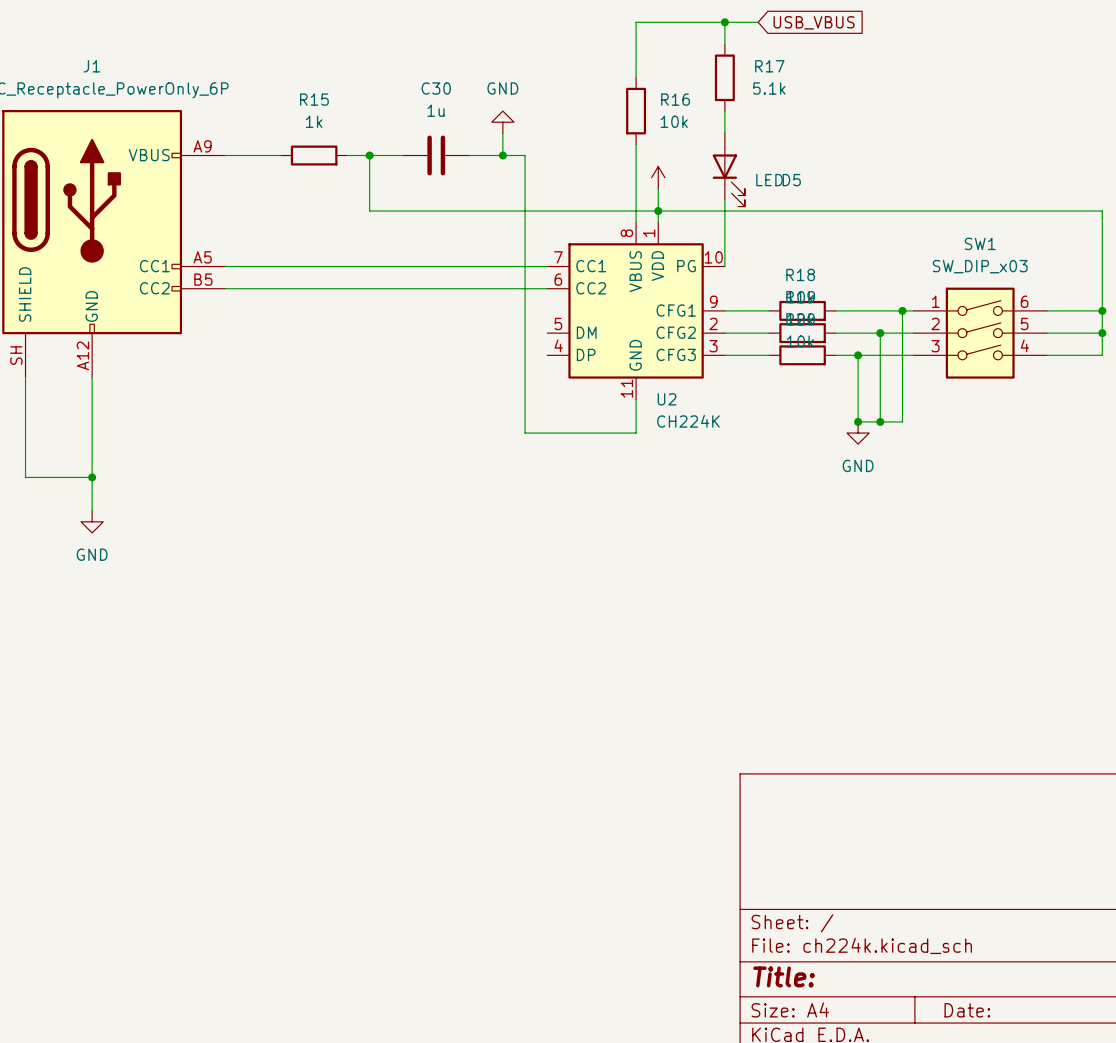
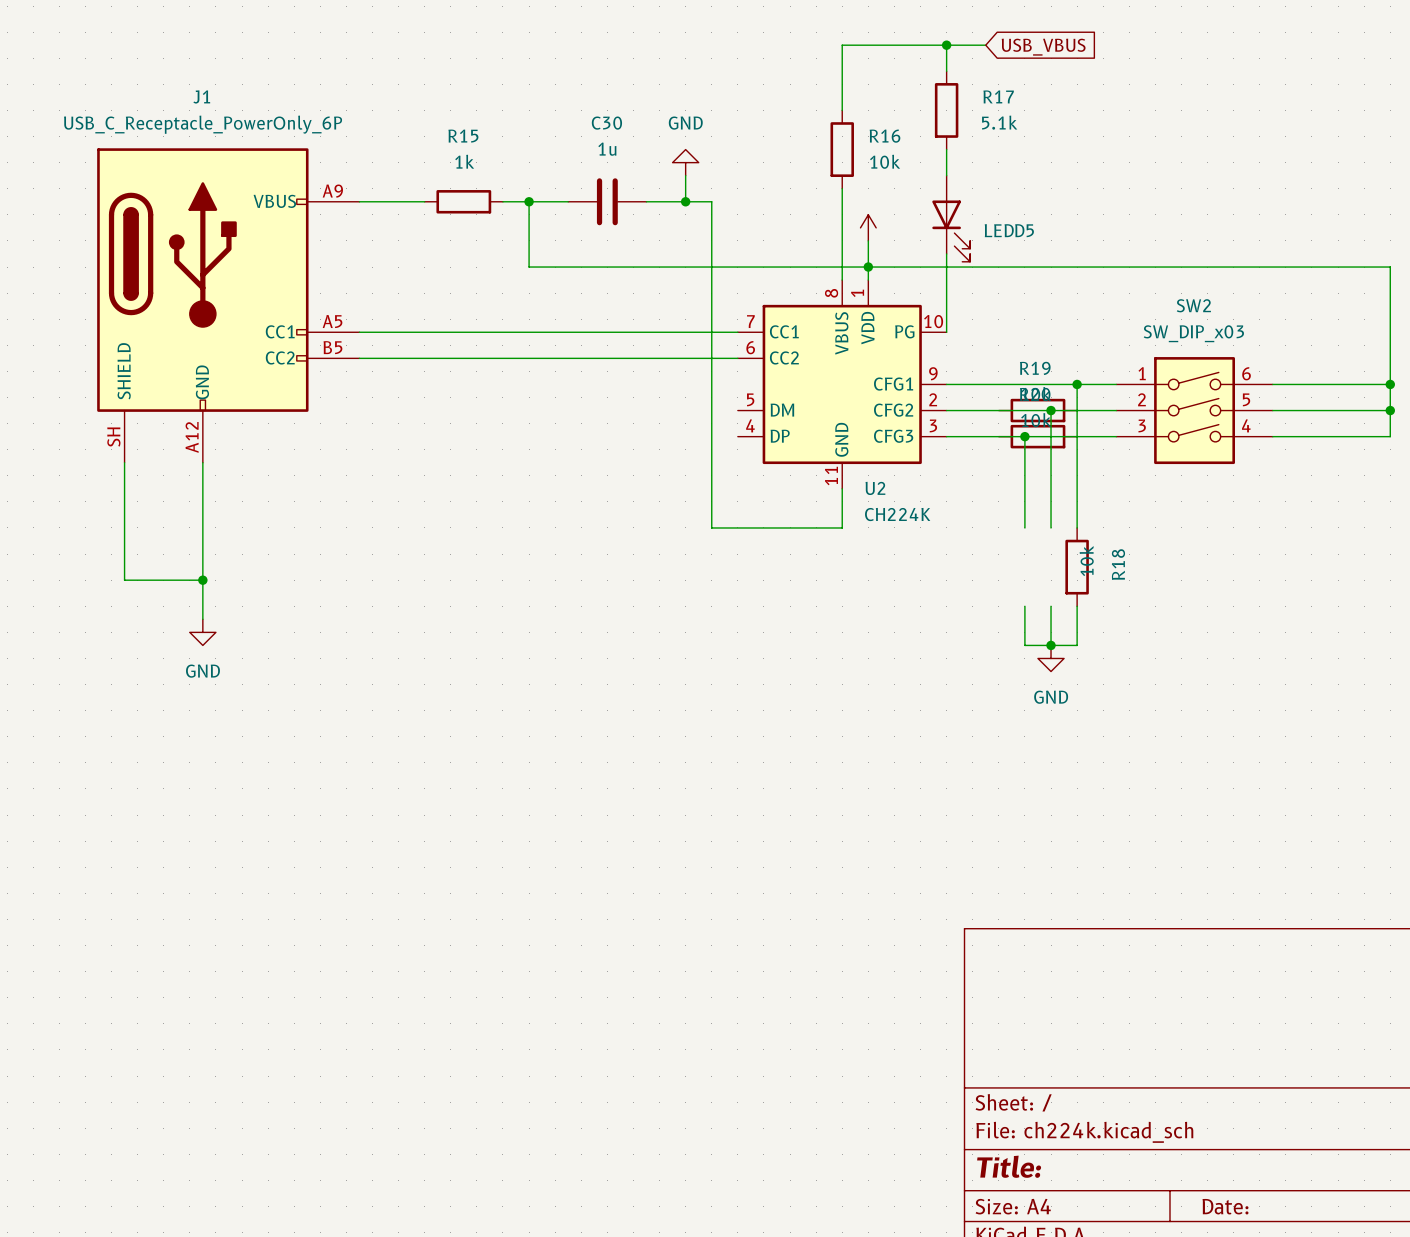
wire: none -> (998, 384) (1077, 384) (1077, 527)
R18 rotation: 0° (802, 310) -> 90° clockwise (1077, 567)
R18 position: (802, 310) -> (1077, 567)
junction: none -> (1077, 384)
wire: (902, 310) (902, 421) (858, 421) (858, 355) -> none
junction: (902, 310) -> none
wire: none -> (998, 410) (1077, 410)
wire: none -> (1051, 410) (1051, 527)
junction: none -> (1051, 410)
wire: (880, 333) (880, 421) -> none
junction: (880, 333) -> none
SW2: none -> SW_DIP_x03 (1194, 410)
SW1: SW_DIP_x03 (980, 333) -> none
wire: none -> (998, 436) (1077, 436)
wire: none -> (1024, 436) (1024, 527)
junction: none -> (1024, 436)
junction: (858, 355) -> none
junction: (858, 421) -> none
junction: (880, 421) -> none
power symbol position: GND (858, 433) -> GND (1051, 658)
wire: none -> (1024, 606) (1024, 645) (1077, 645) (1077, 606)
wire: none -> (1051, 606) (1051, 645)
junction: none -> (1051, 645)

